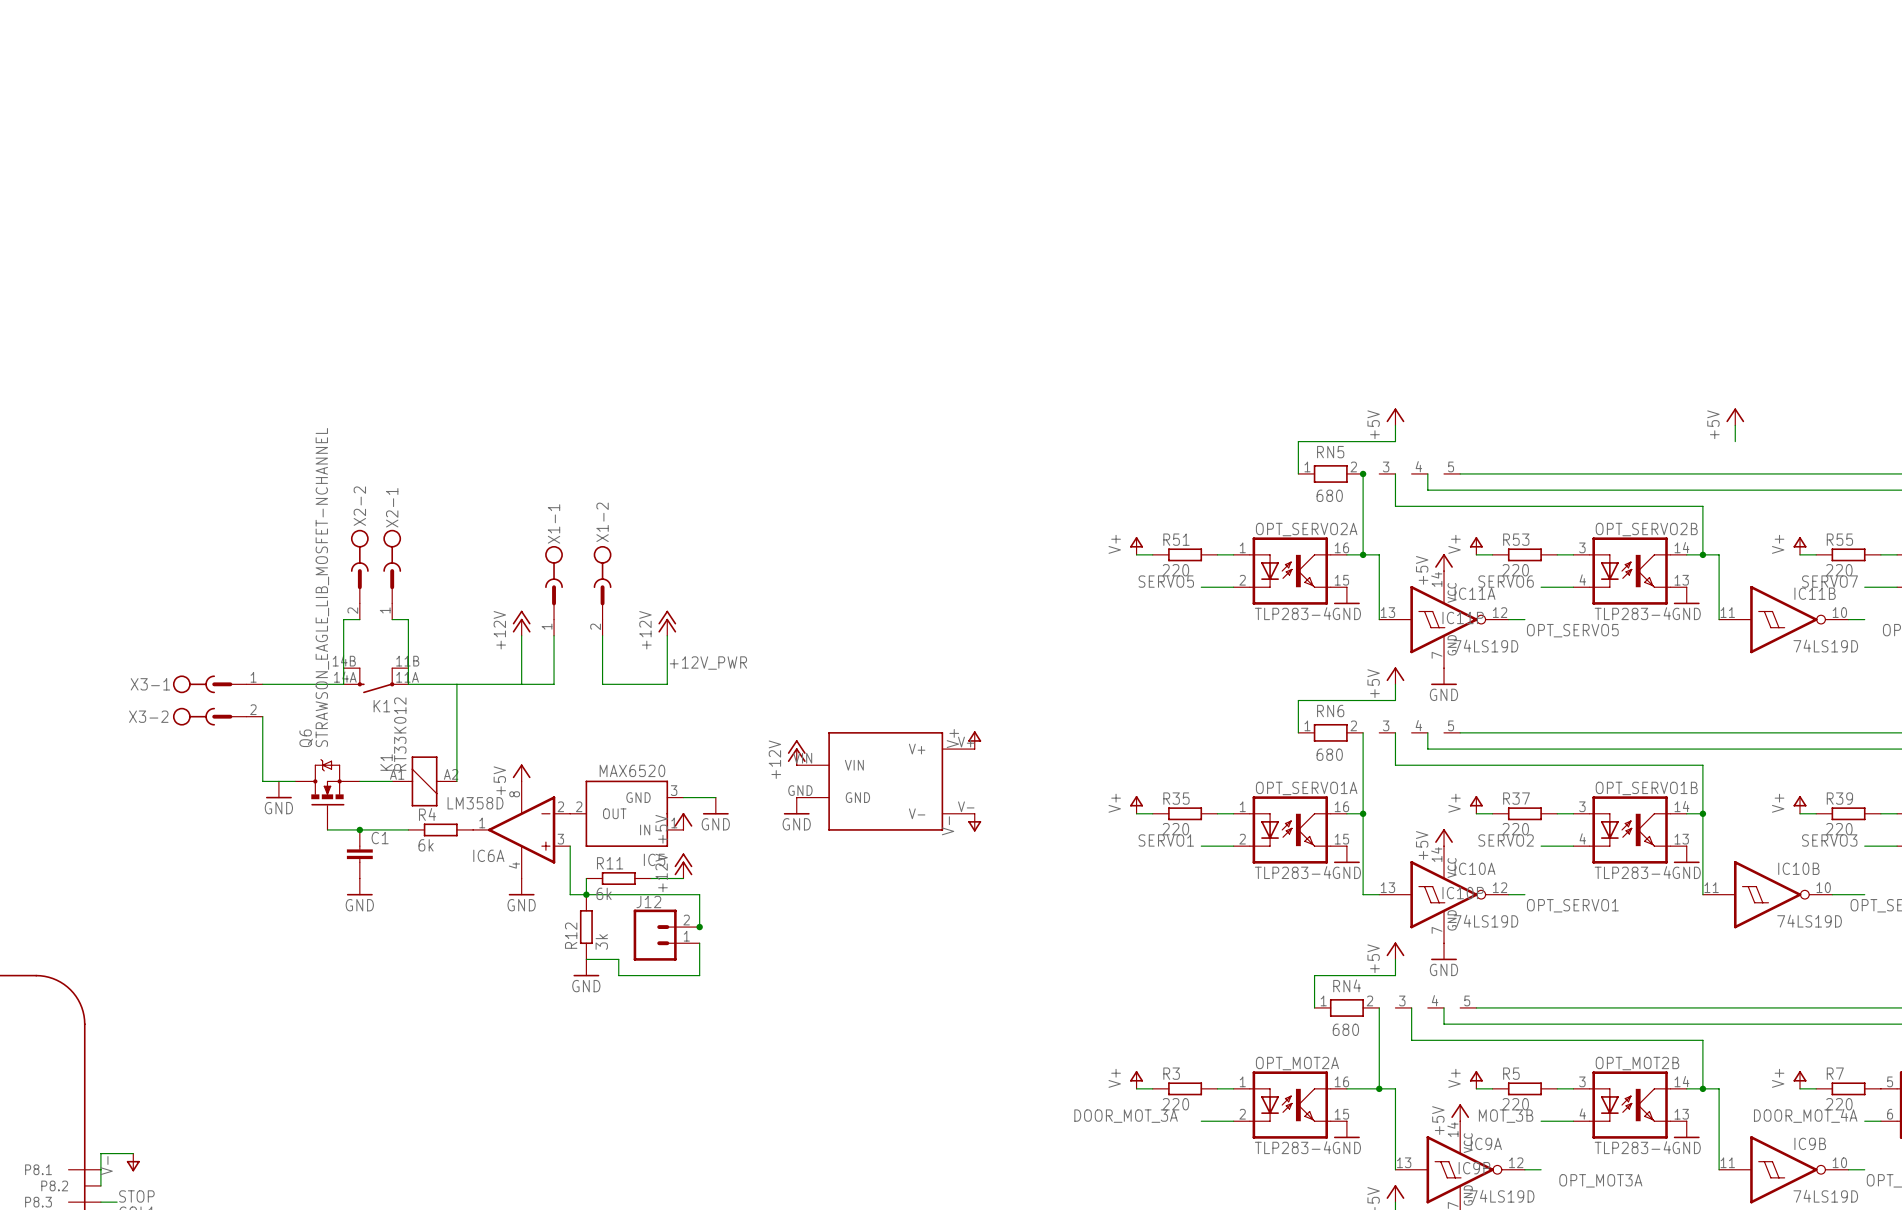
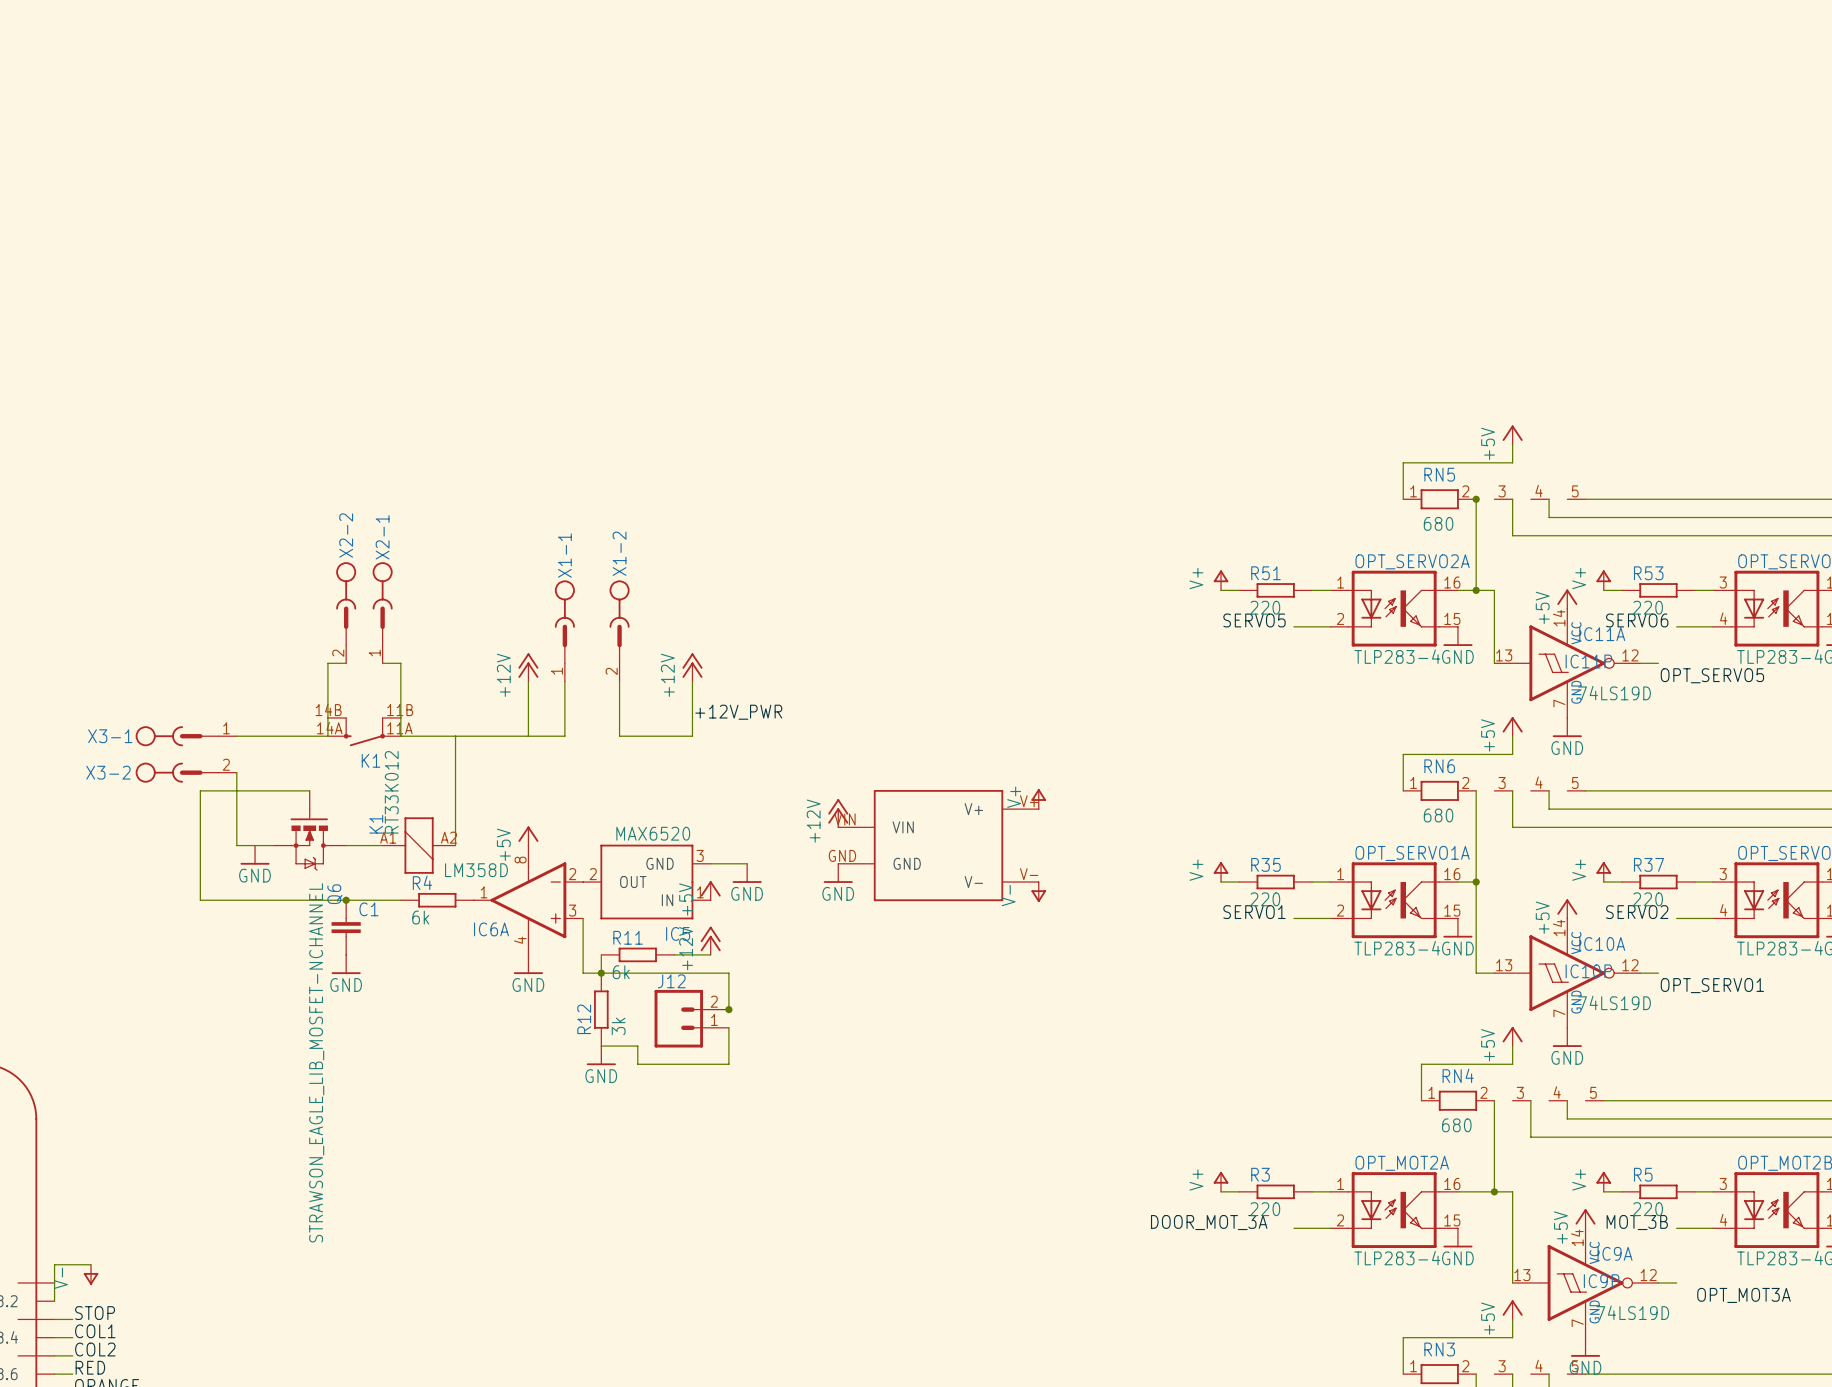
wire: none -> (309, 790) (200, 790) (200, 900) (309, 900)
Q6 rotation: 0° (327, 786) -> 180° (309, 839)

